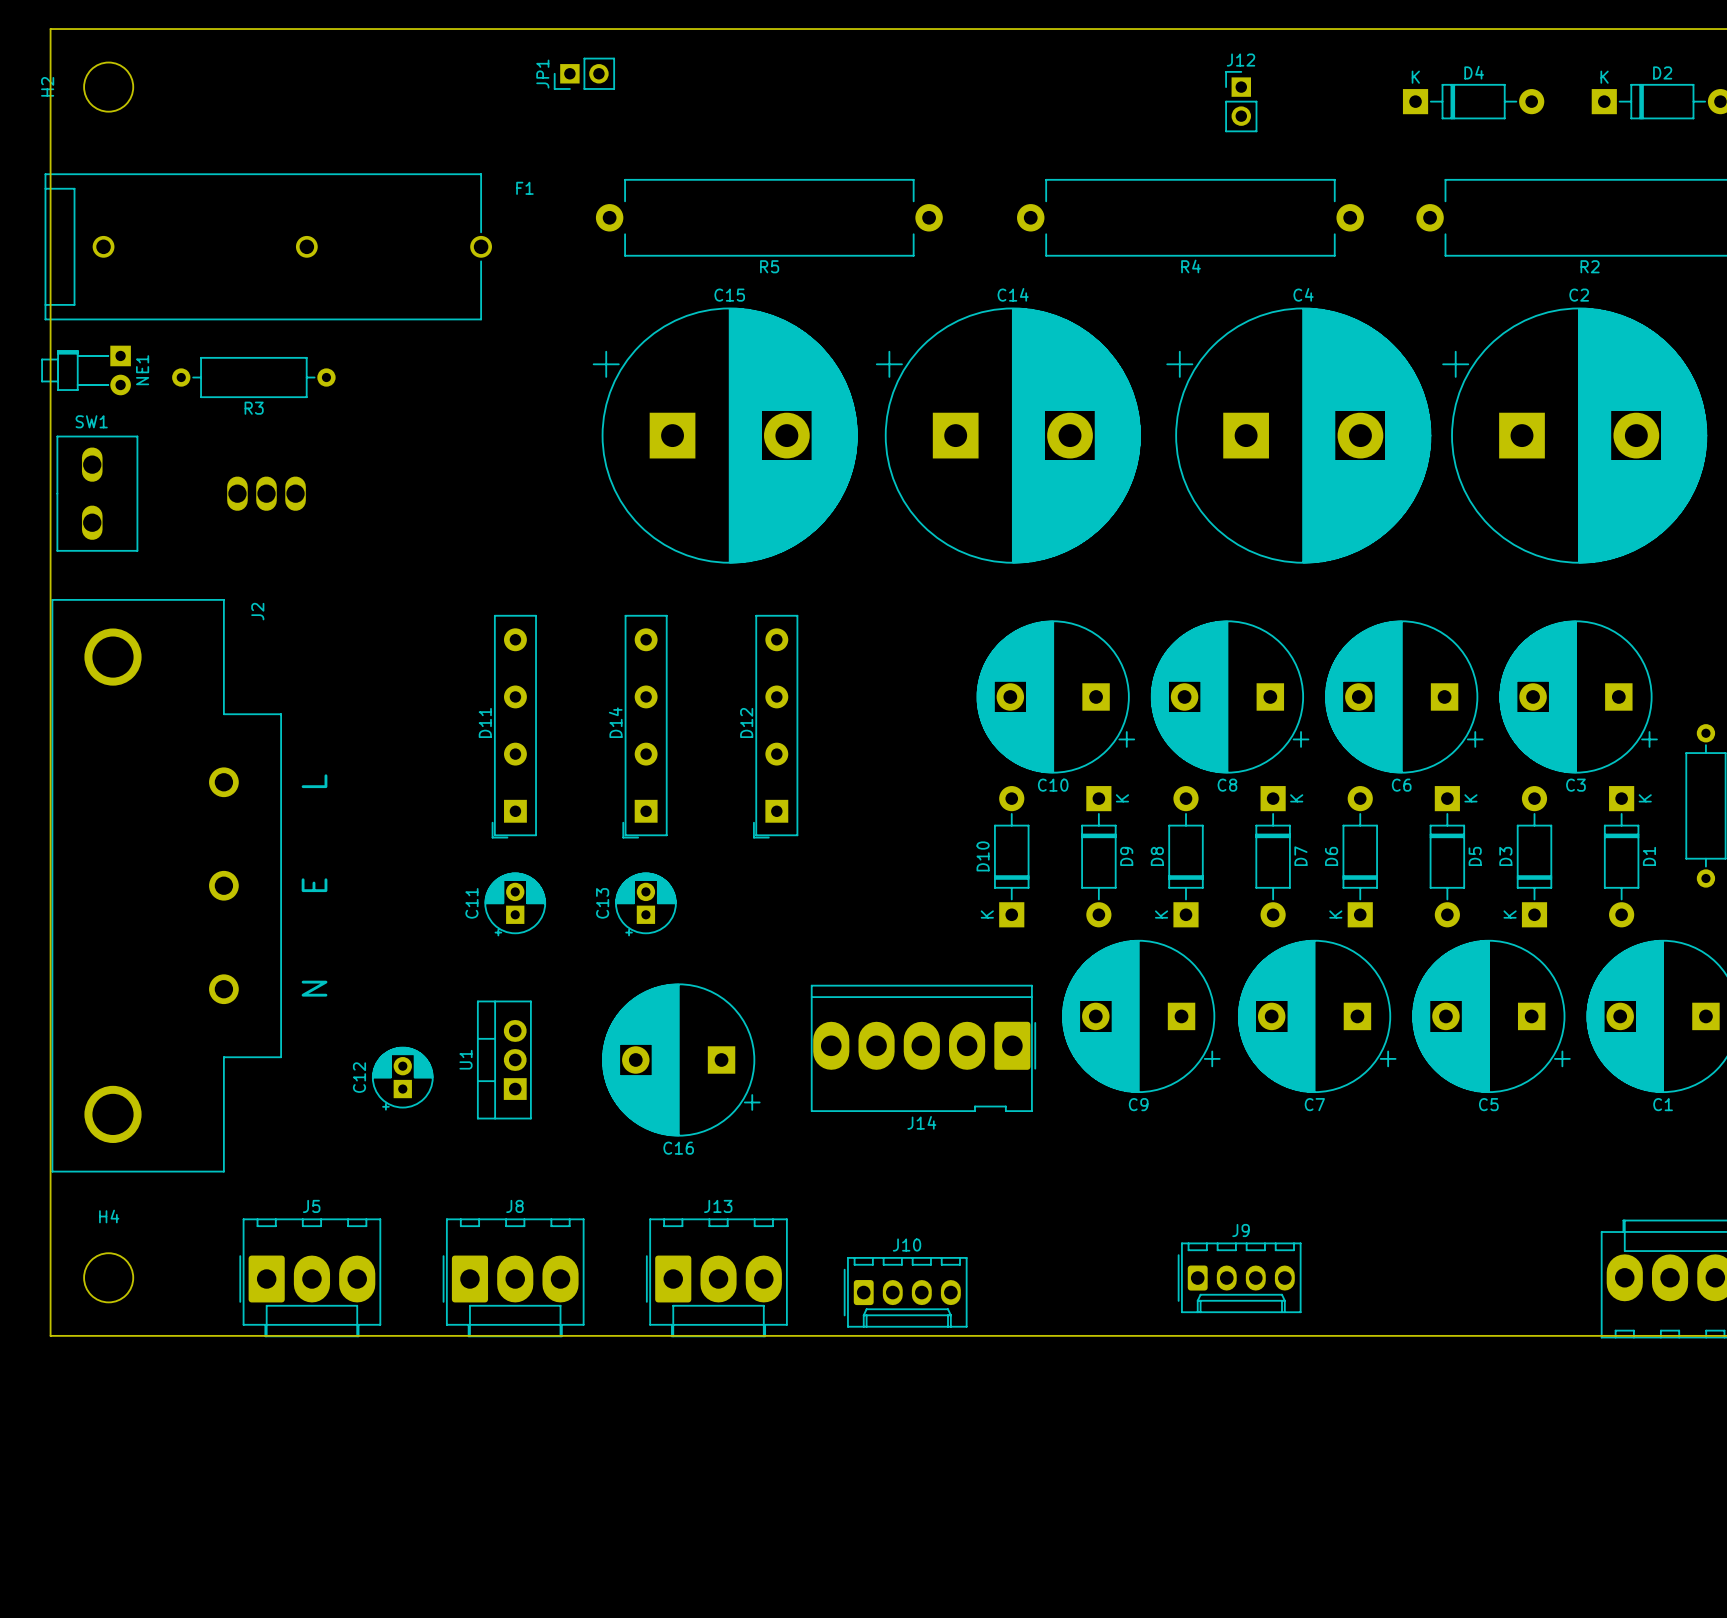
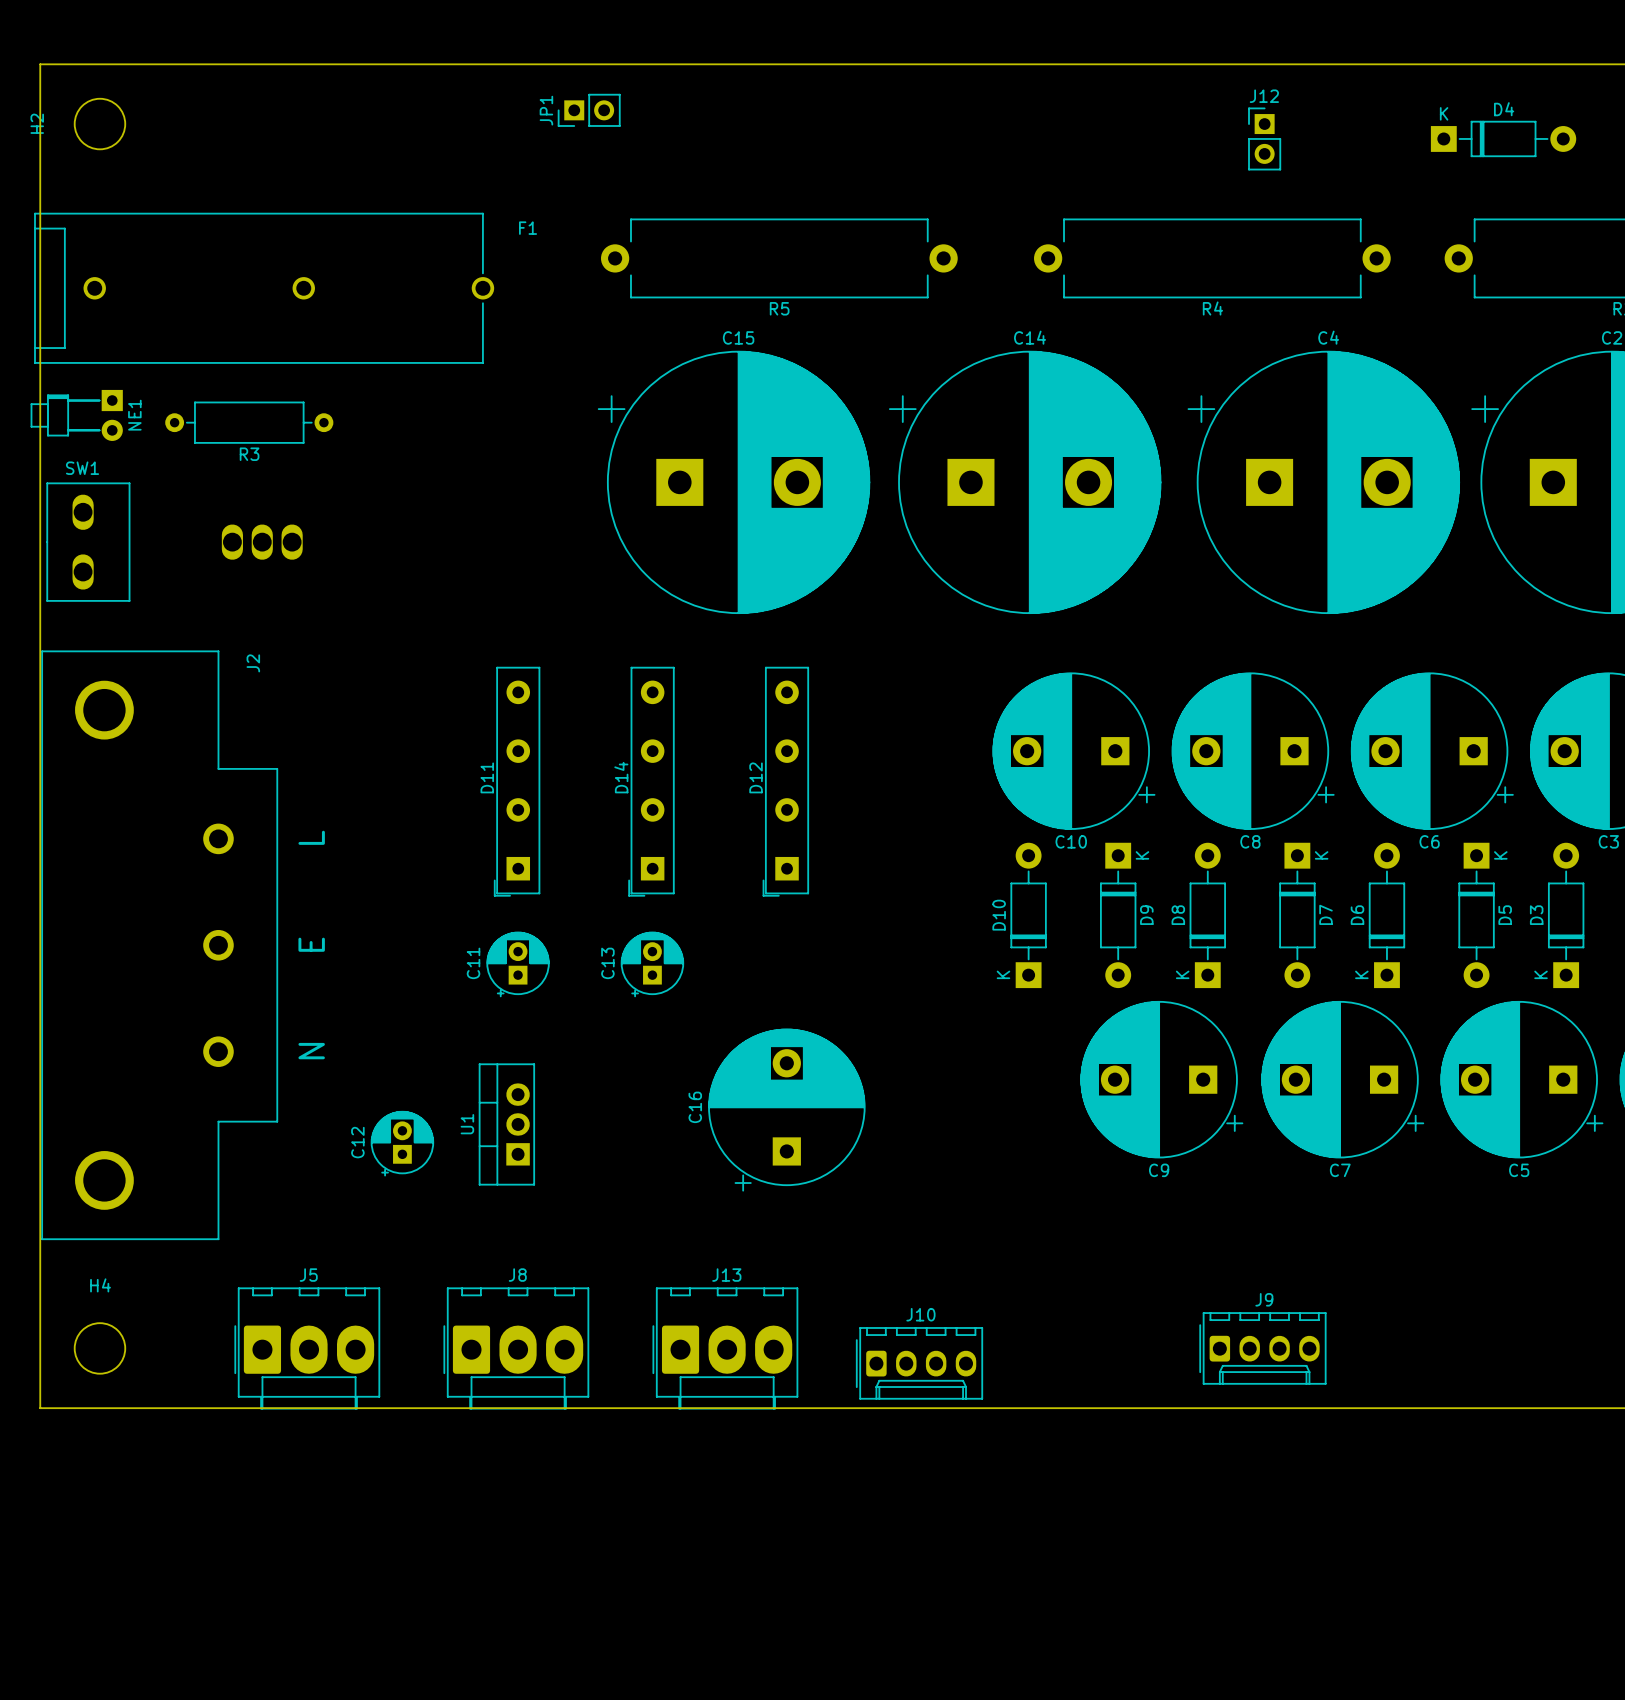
J14: (923, 1048) -> none
C16 rotation: 0° (681, 1059) -> 90° clockwise (786, 1110)
C16 position: (681, 1059) -> (786, 1110)

